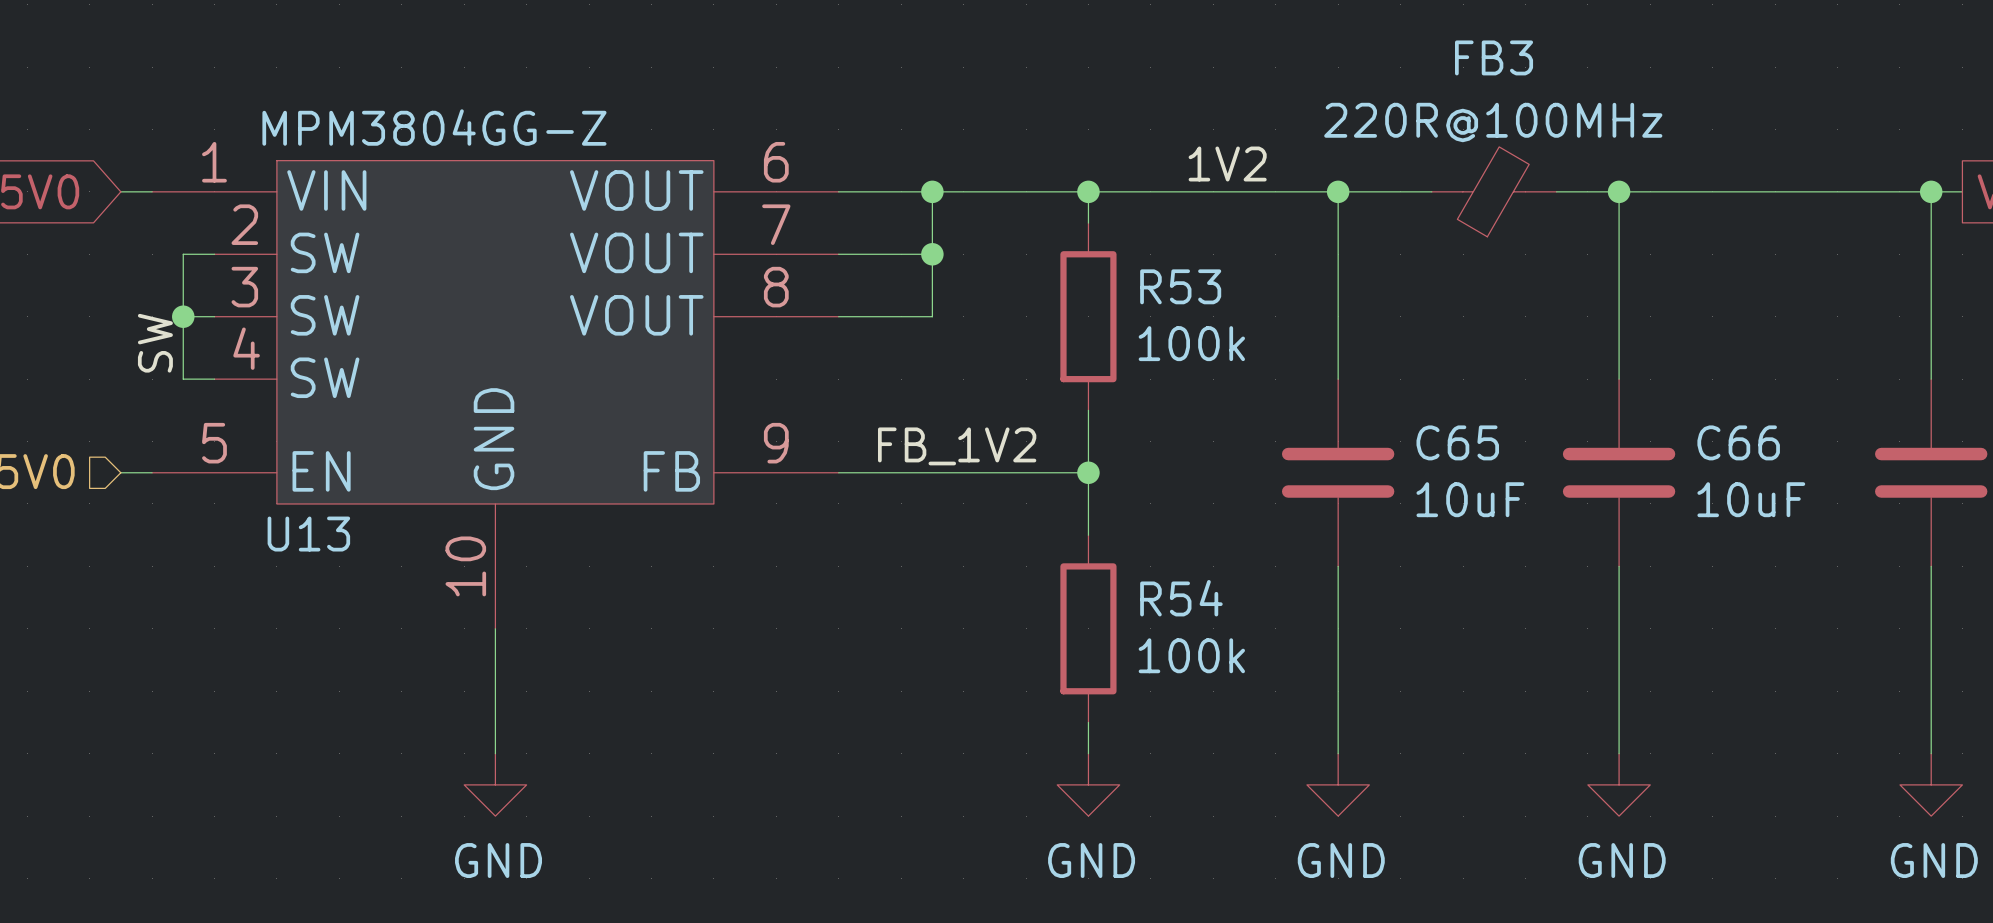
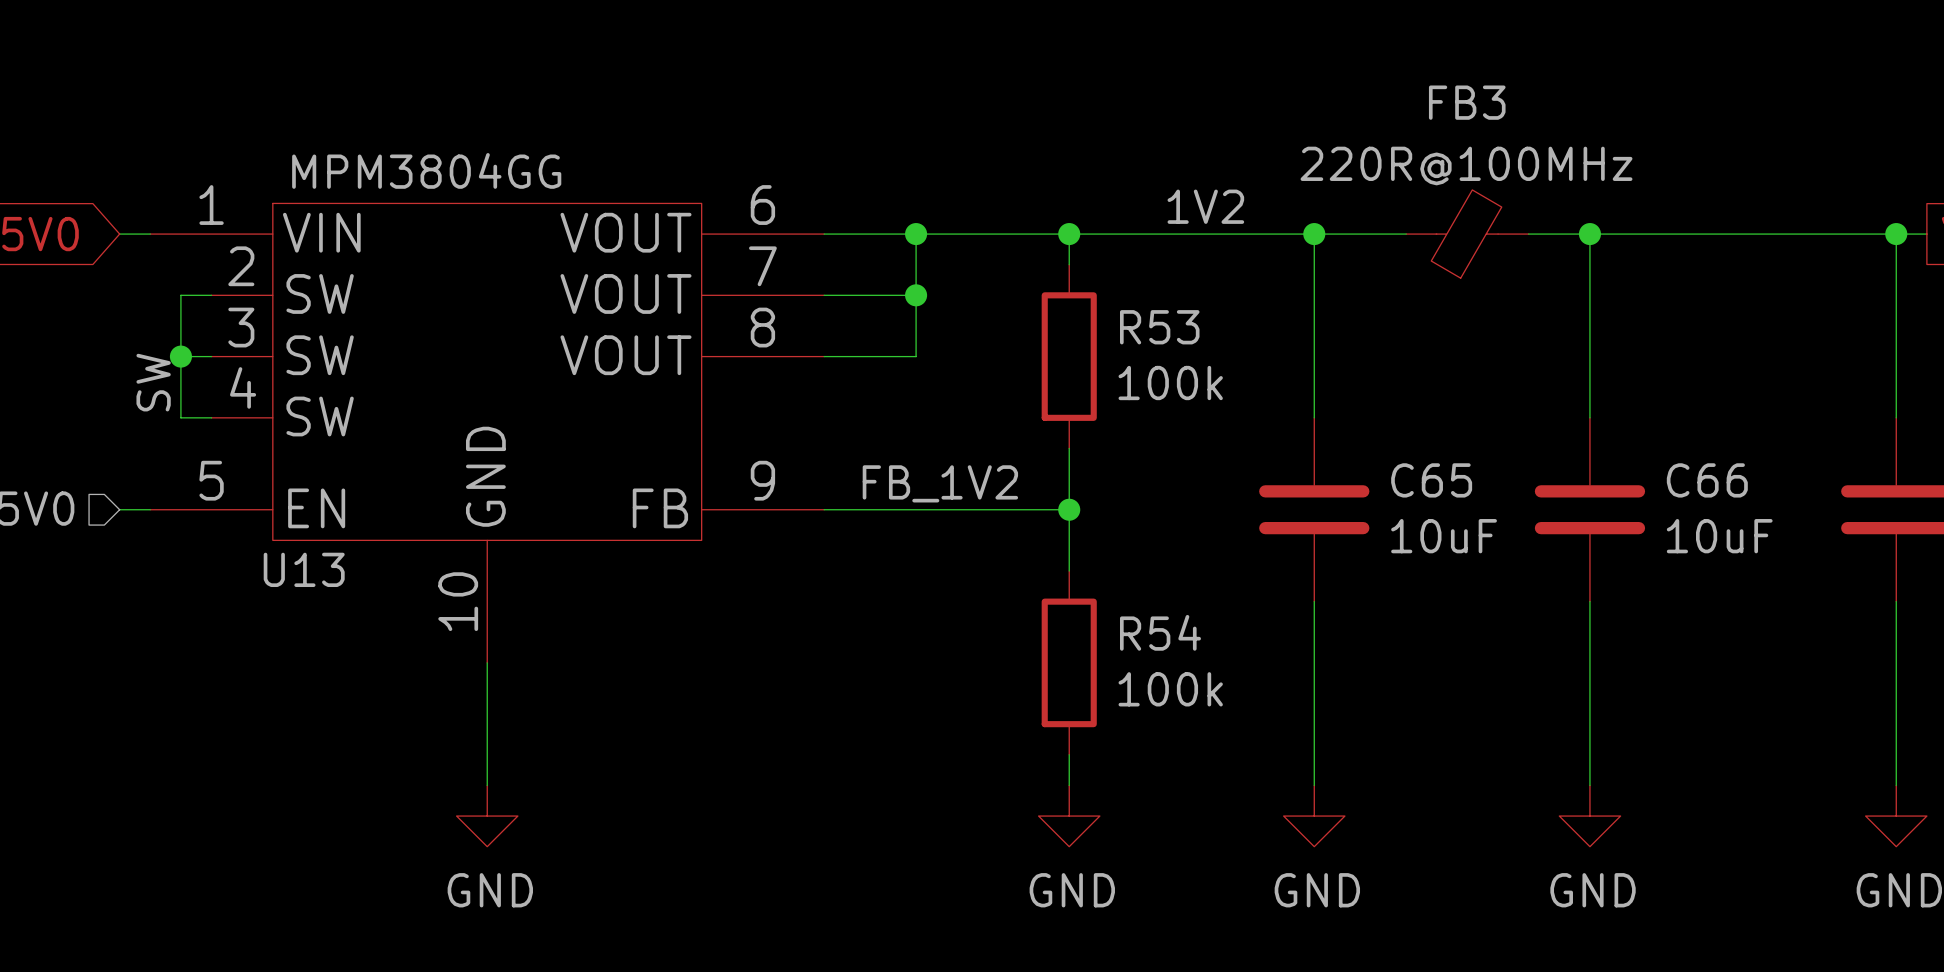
U13 value: MPM3804GG-Z (434, 127) -> MPM3804GG (426, 170)

